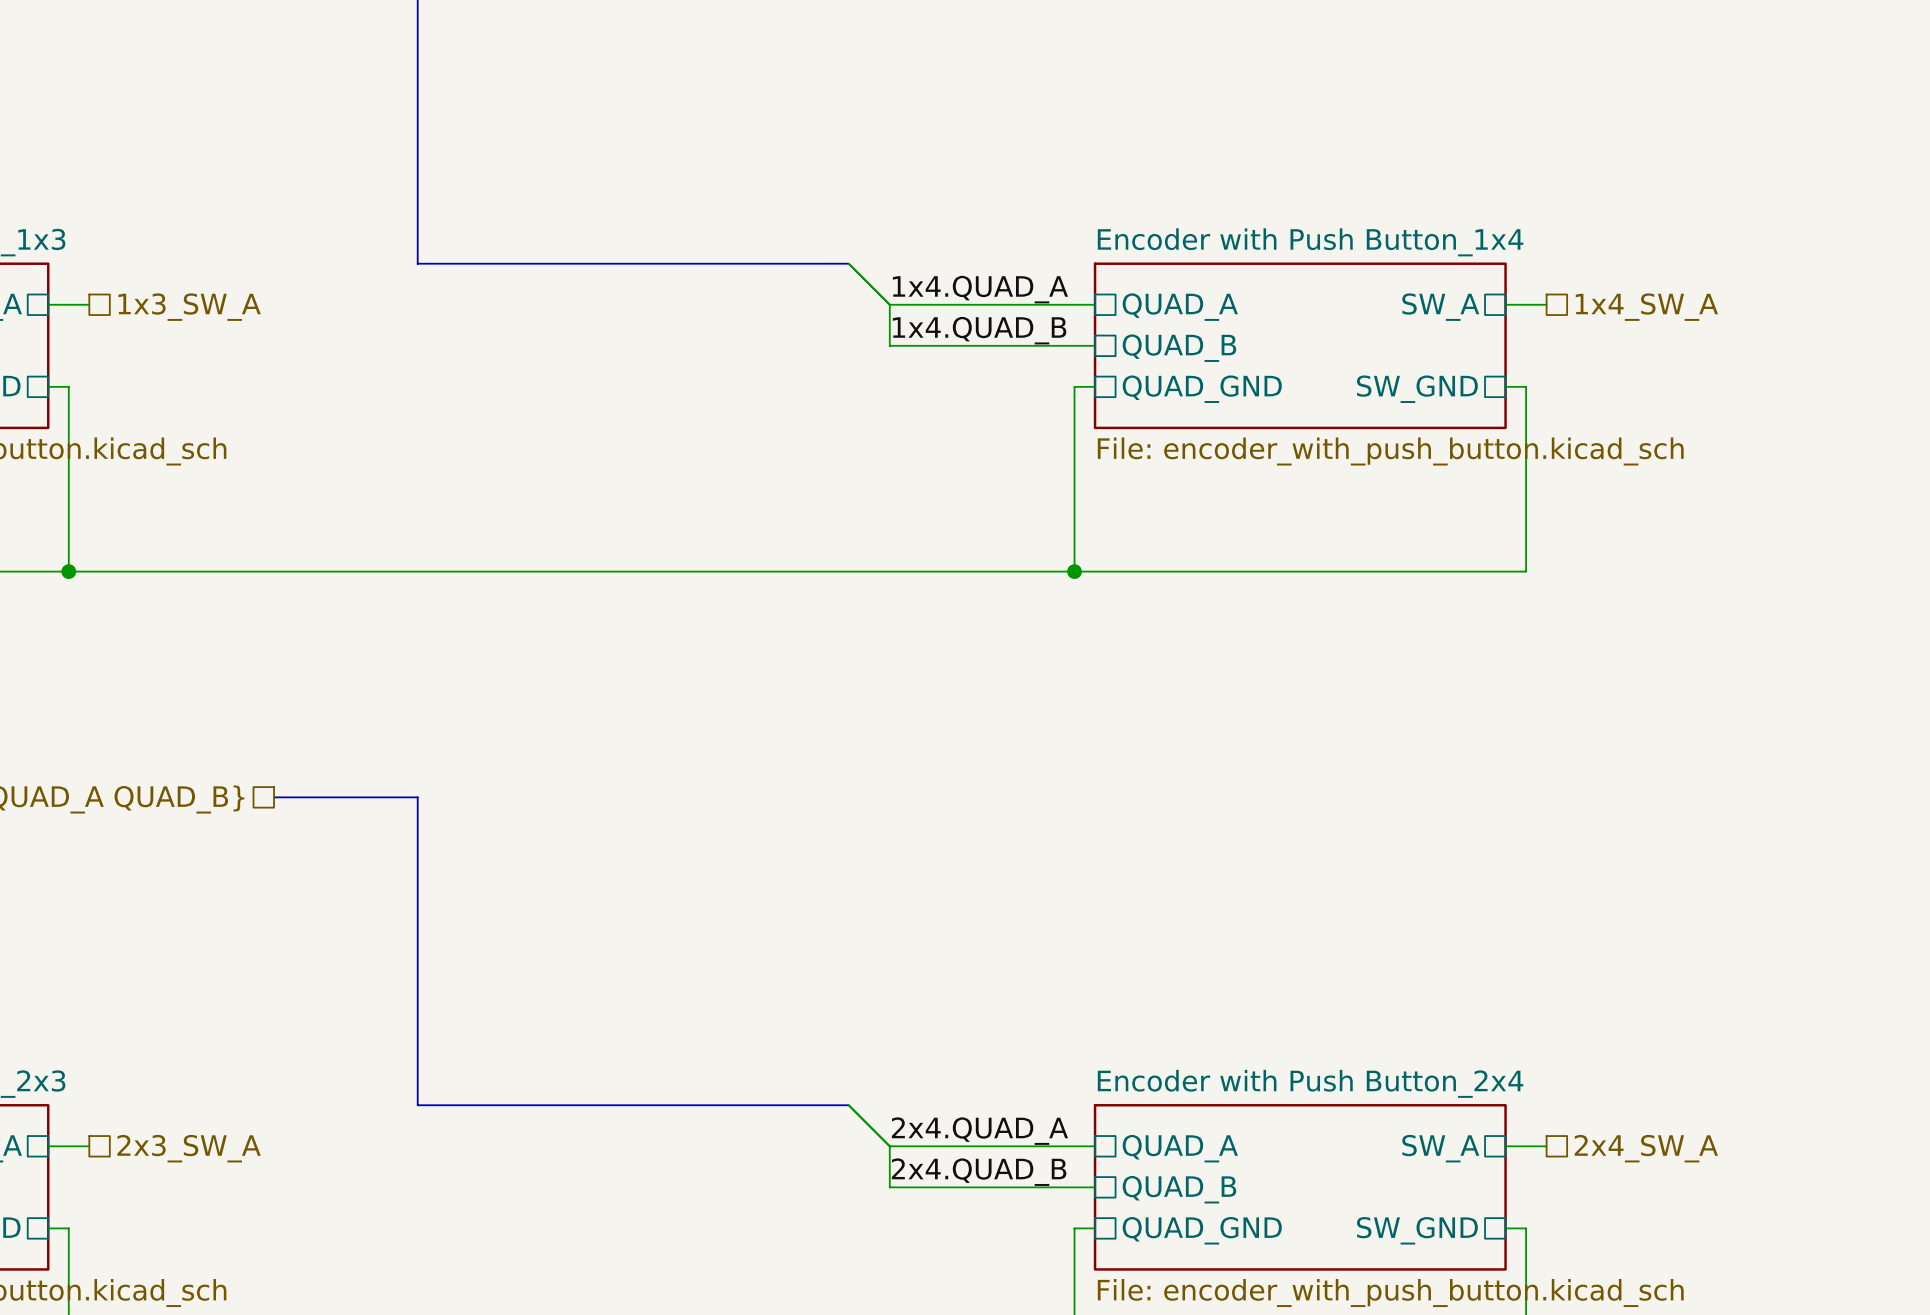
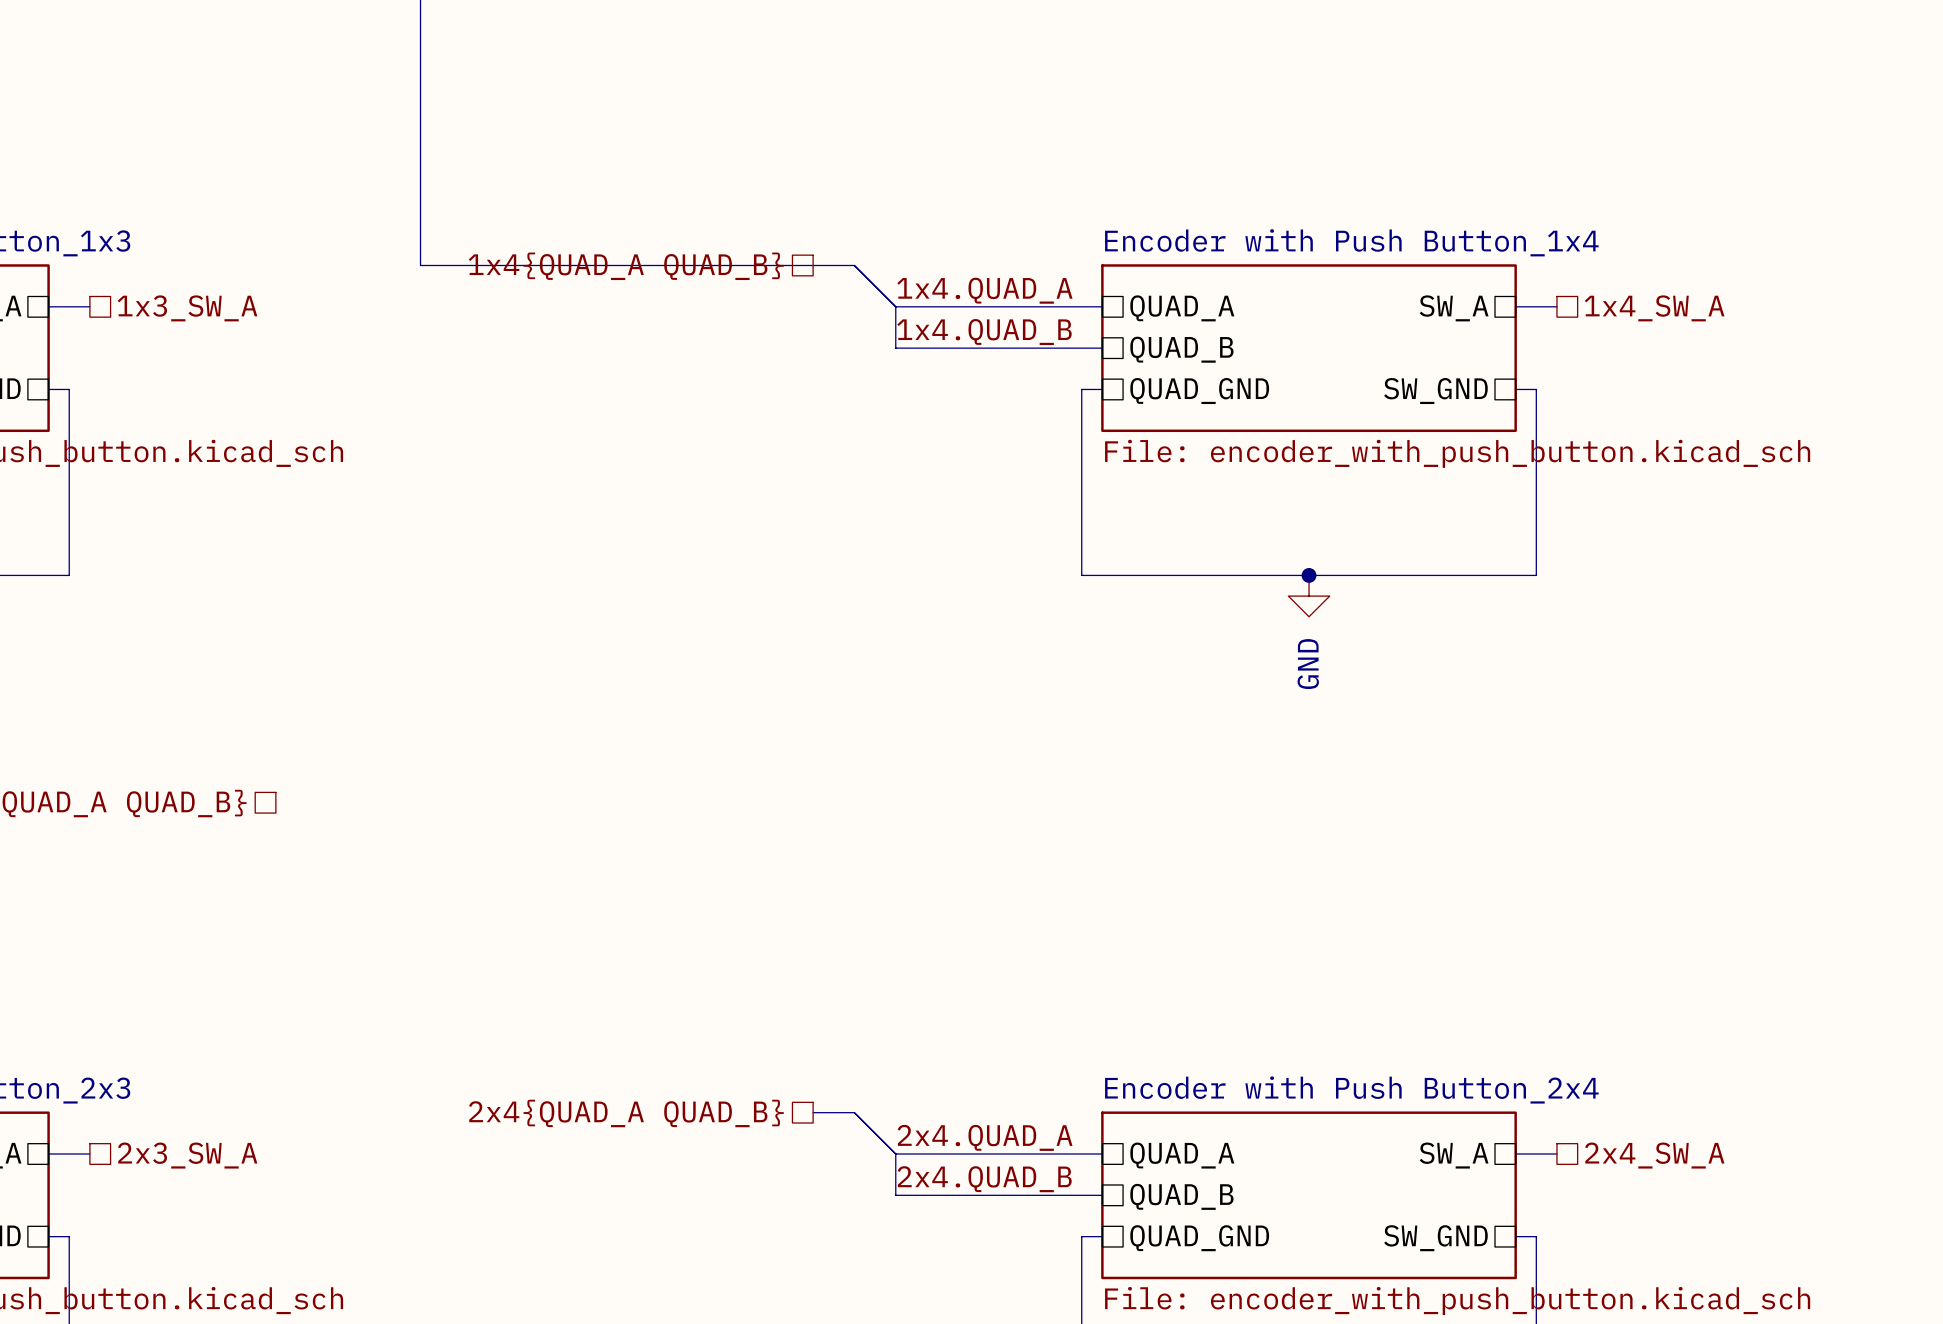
hierarchical label: none -> 1x4{QUAD_A QUAD_B} (626, 266)
wire: (68, 571) (1074, 571) -> none
junction: (68, 571) -> none
junction: (1074, 571) -> none
junction: none -> (1309, 575)
power symbol: none -> GND (1309, 596)
bus: (274, 797) (417, 797) (417, 1105) (807, 1105) -> none
hierarchical label: none -> 2x4{QUAD_A QUAD_B} (626, 1113)

